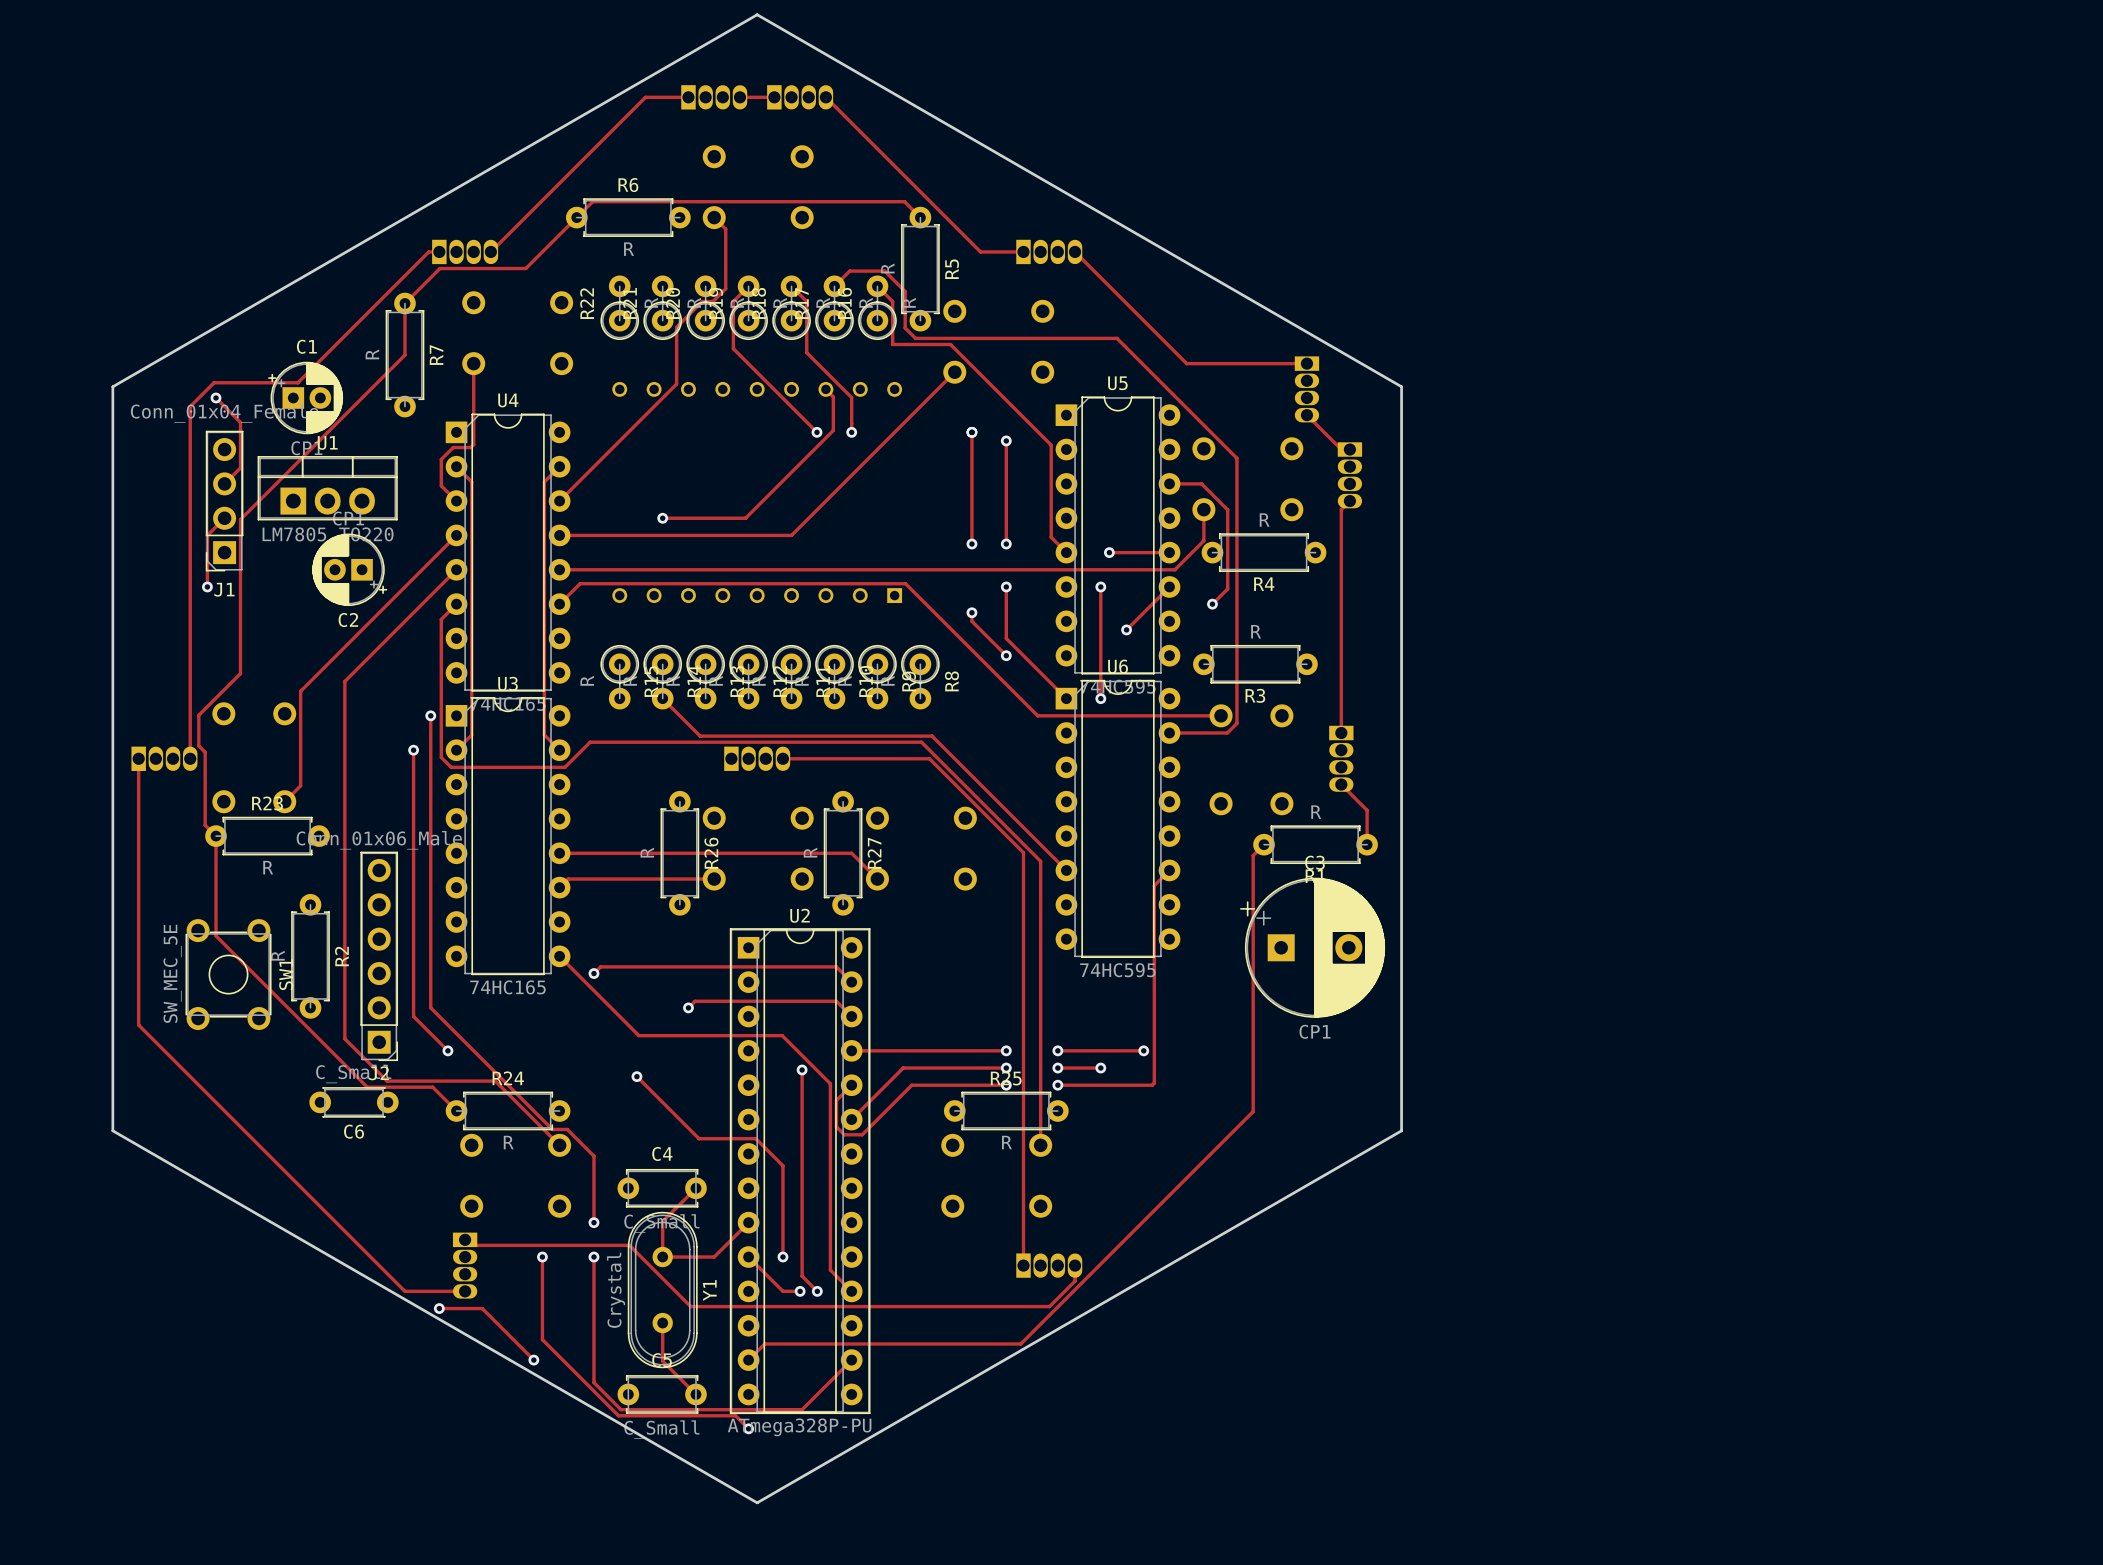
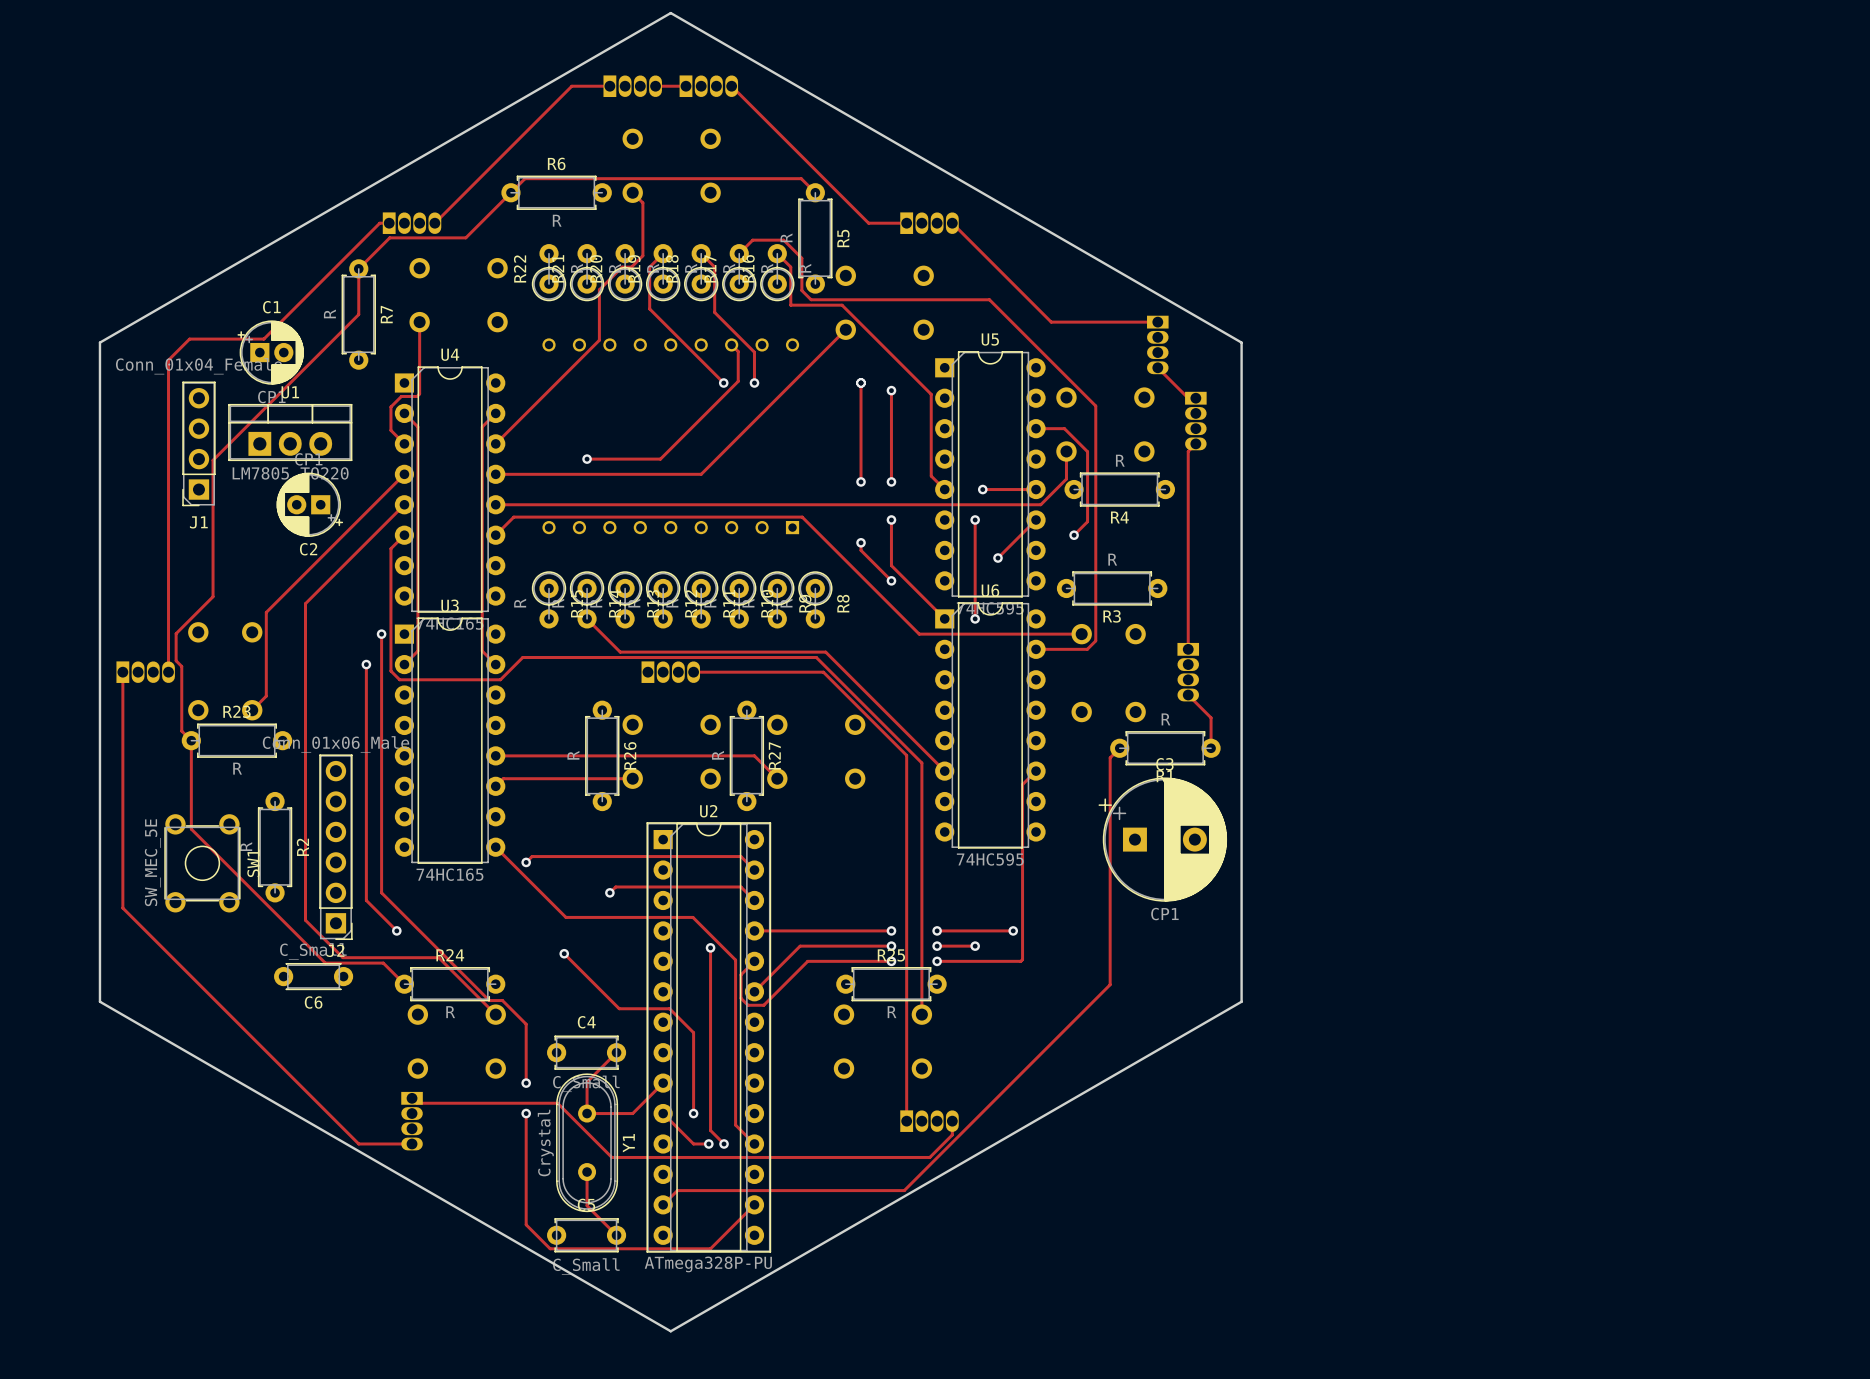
track: (216, 397) (240, 422) (240, 467) (224, 483) -> none
via: (216, 397) -> none
track: (224, 518) (207, 535) (207, 586) -> none
via: (207, 586) -> none
track: (542, 1257) (542, 1339) (618, 1415) (735, 1415) (748, 1428) -> none
via: (542, 1257) -> none
track: (439, 1308) (482, 1308) (533, 1360) -> none
via: (439, 1308) -> none
via: (533, 1360) -> none
via: (748, 1428) -> none

